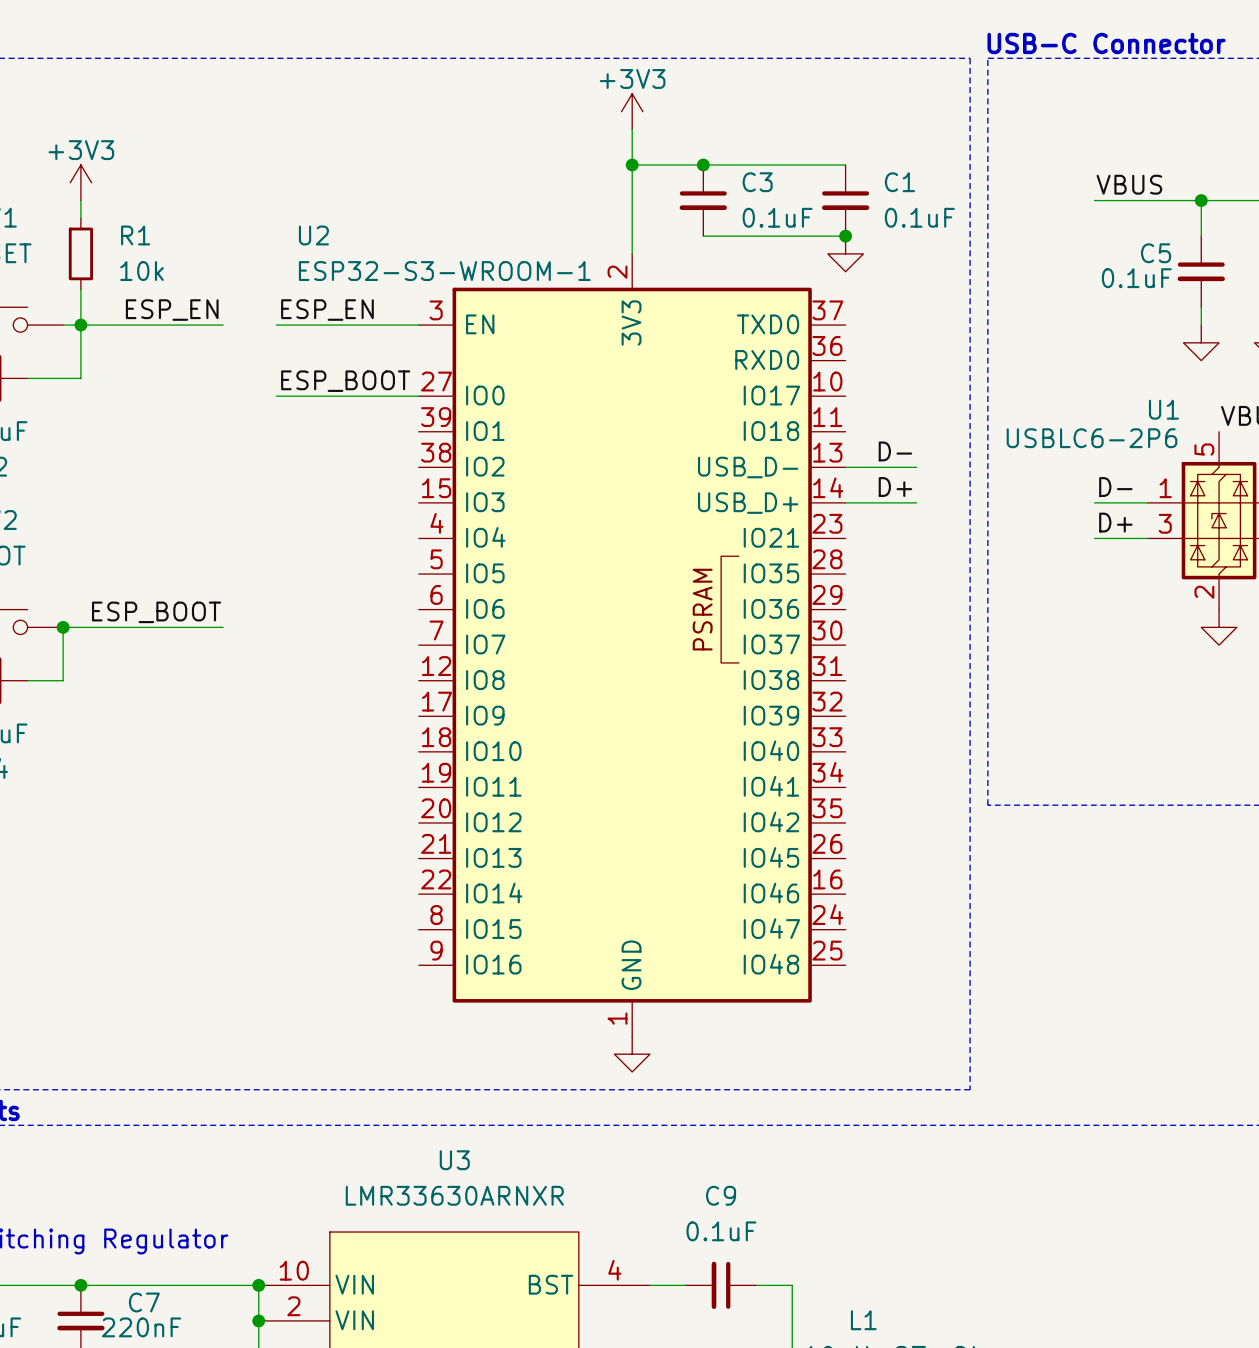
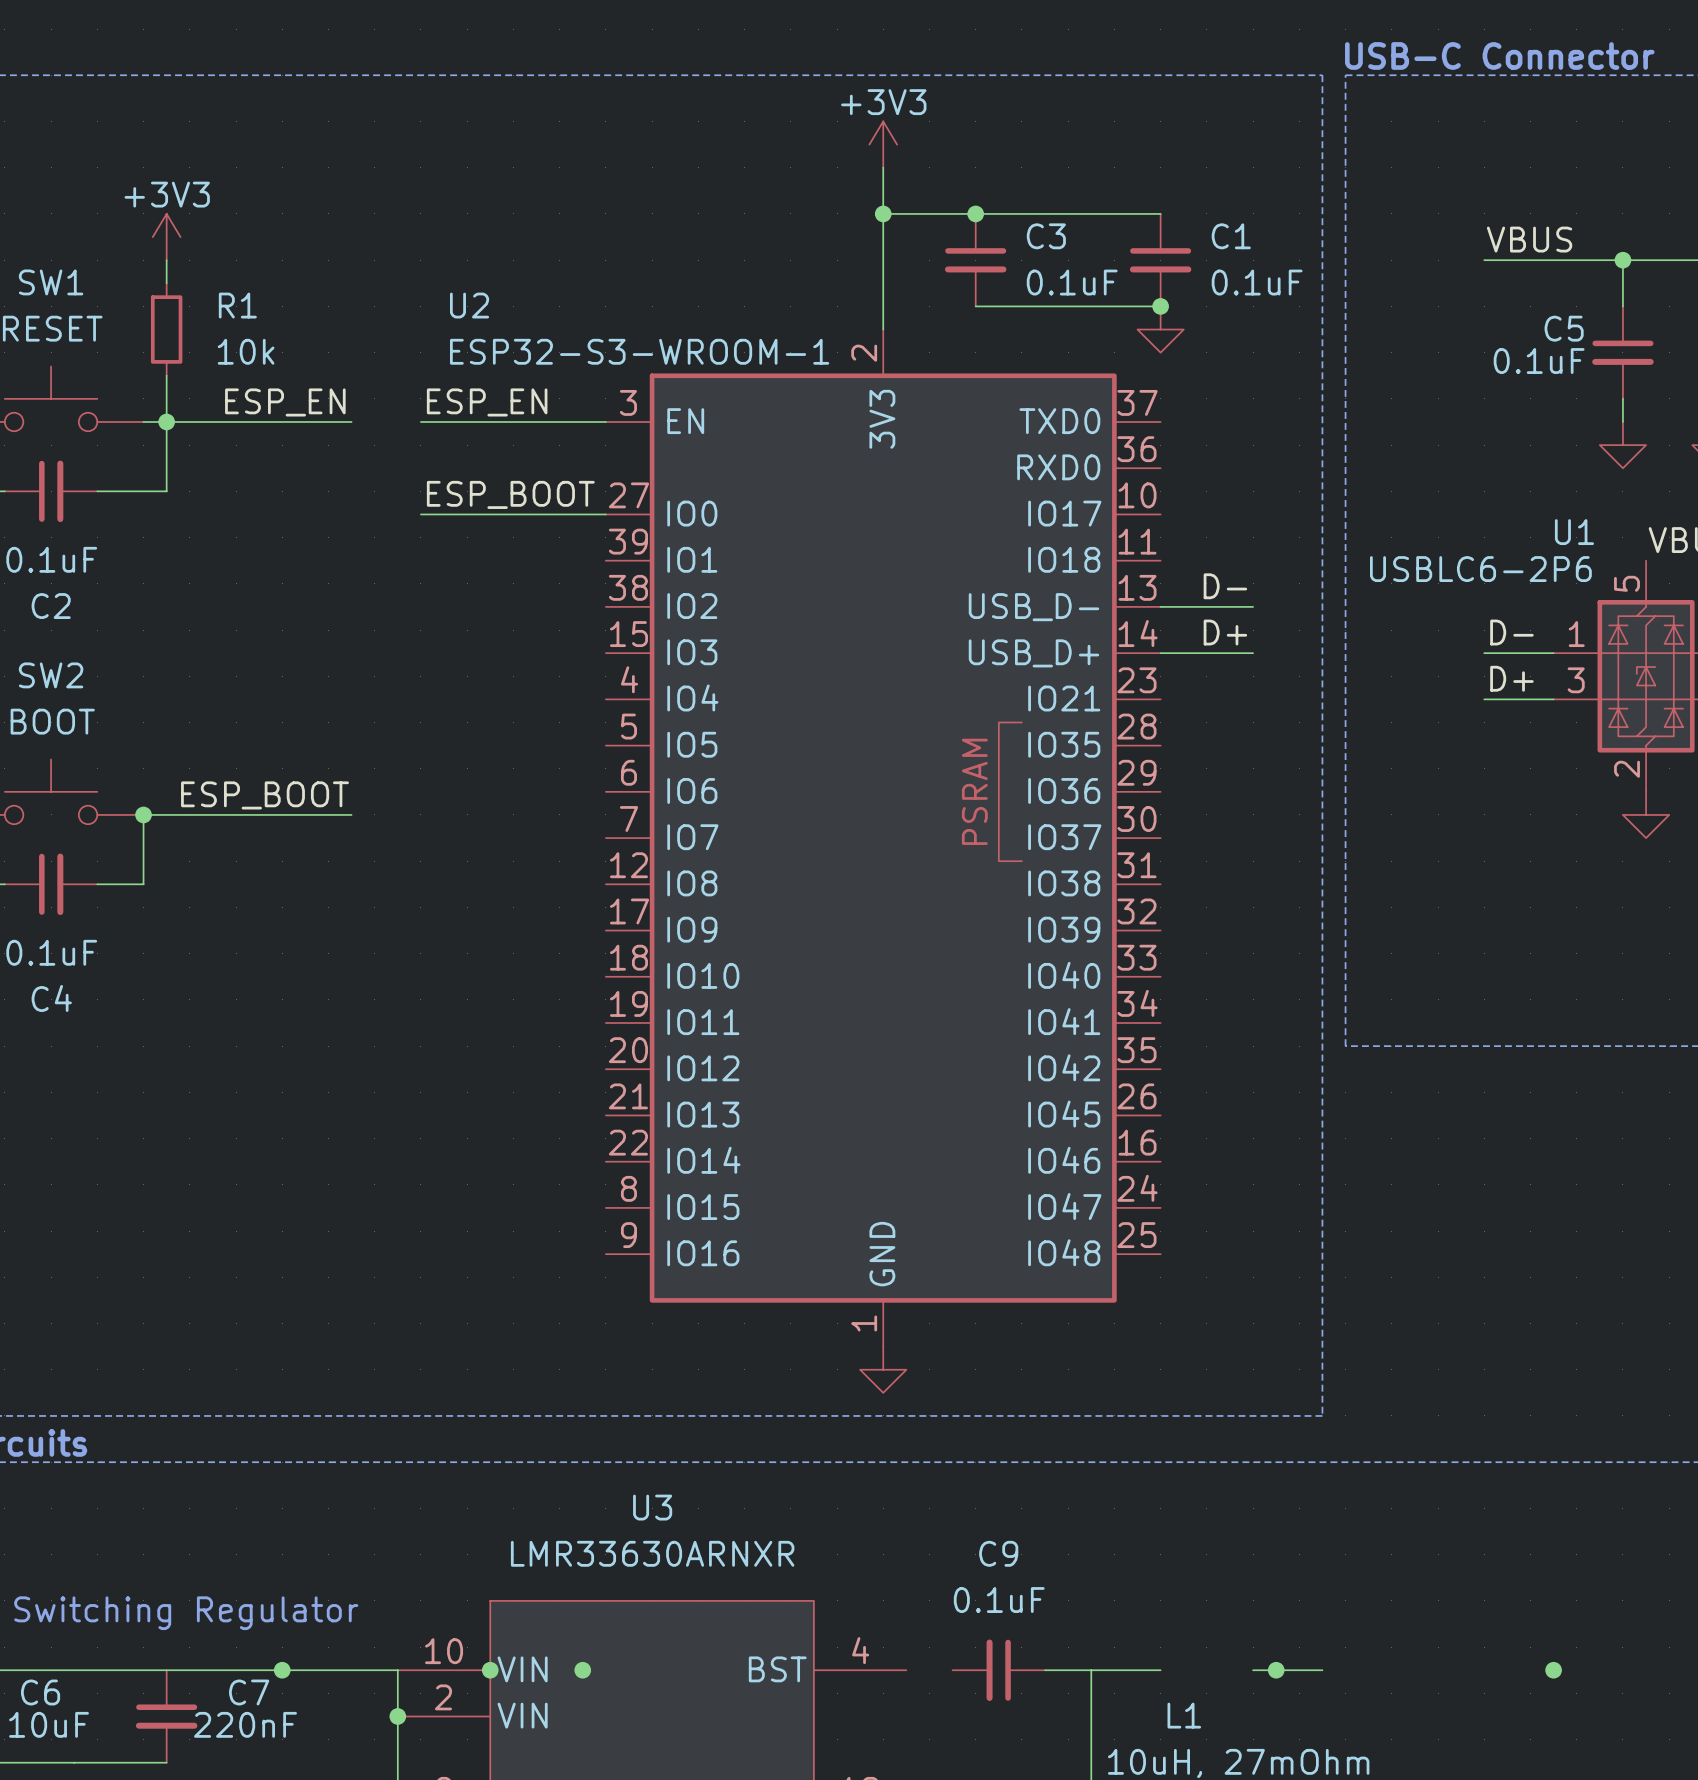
junction: (80, 1285) -> none
junction: none -> (282, 1670)
junction: (258, 1285) -> none
junction: none -> (490, 1670)
junction: none -> (582, 1670)
wire: (649, 1285) (685, 1285) -> none
wire: none -> (1091, 1670) (1160, 1670)
wire: none -> (1253, 1670) (1322, 1670)
junction: none -> (1276, 1670)
junction: none -> (1553, 1670)

